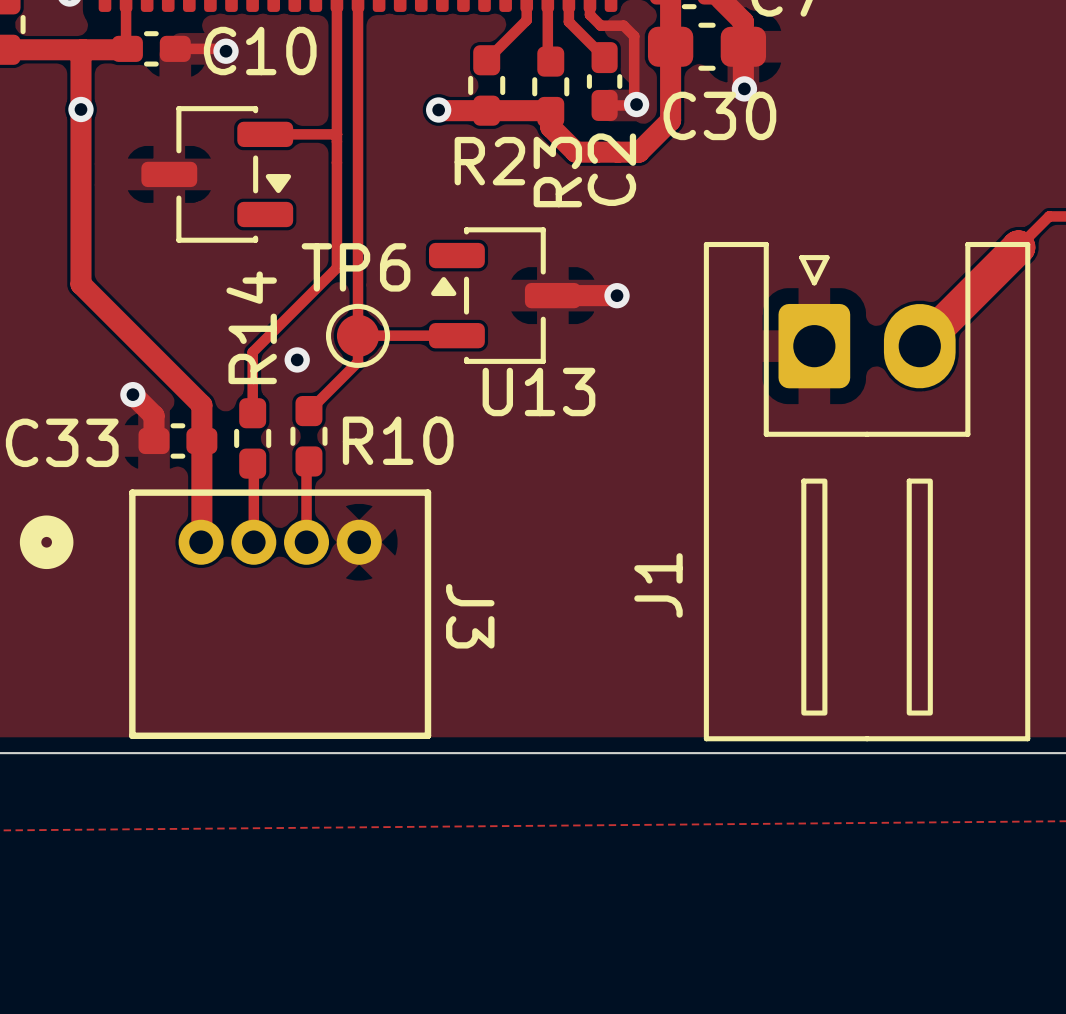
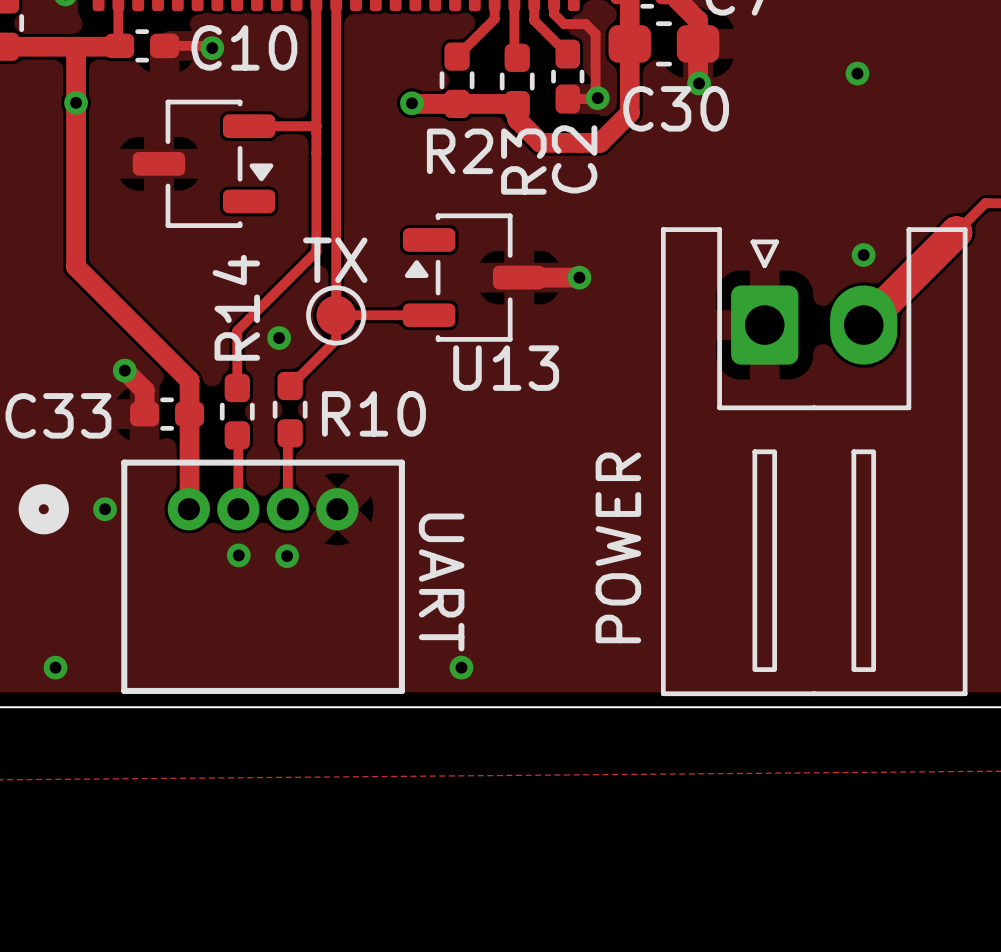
via: none -> (857, 73)
TP6 name: TP6 (356, 267) -> TX (335, 260)
via: none -> (863, 255)
via: none -> (105, 509)
J1 name: J1 (658, 585) -> POWER (618, 547)
via: none -> (238, 555)
via: none -> (287, 556)
J3 name: J3 (470, 616) -> UART (441, 582)
via: none -> (55, 667)
via: none -> (461, 667)

